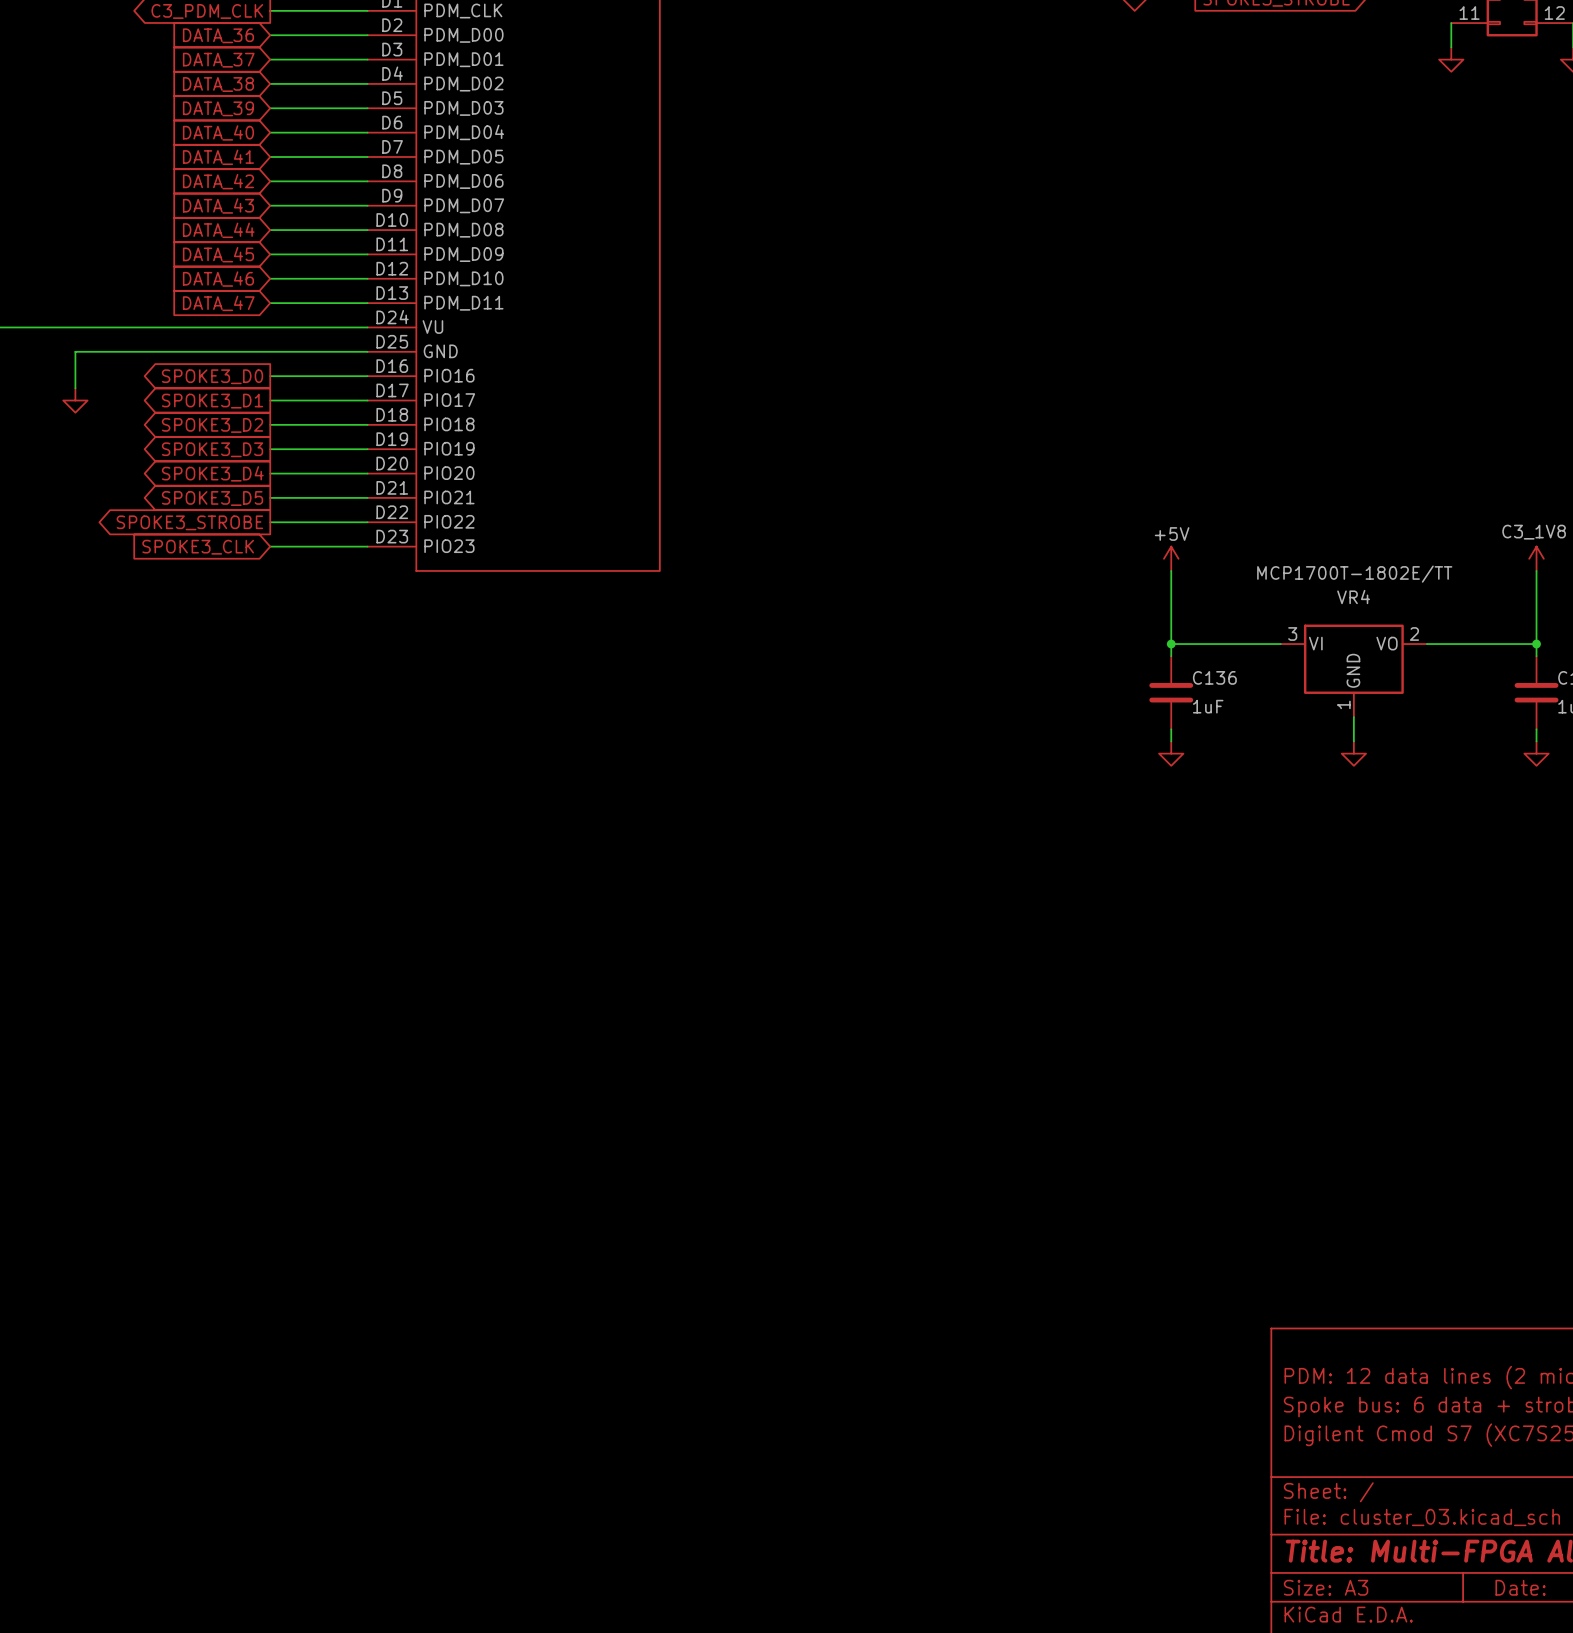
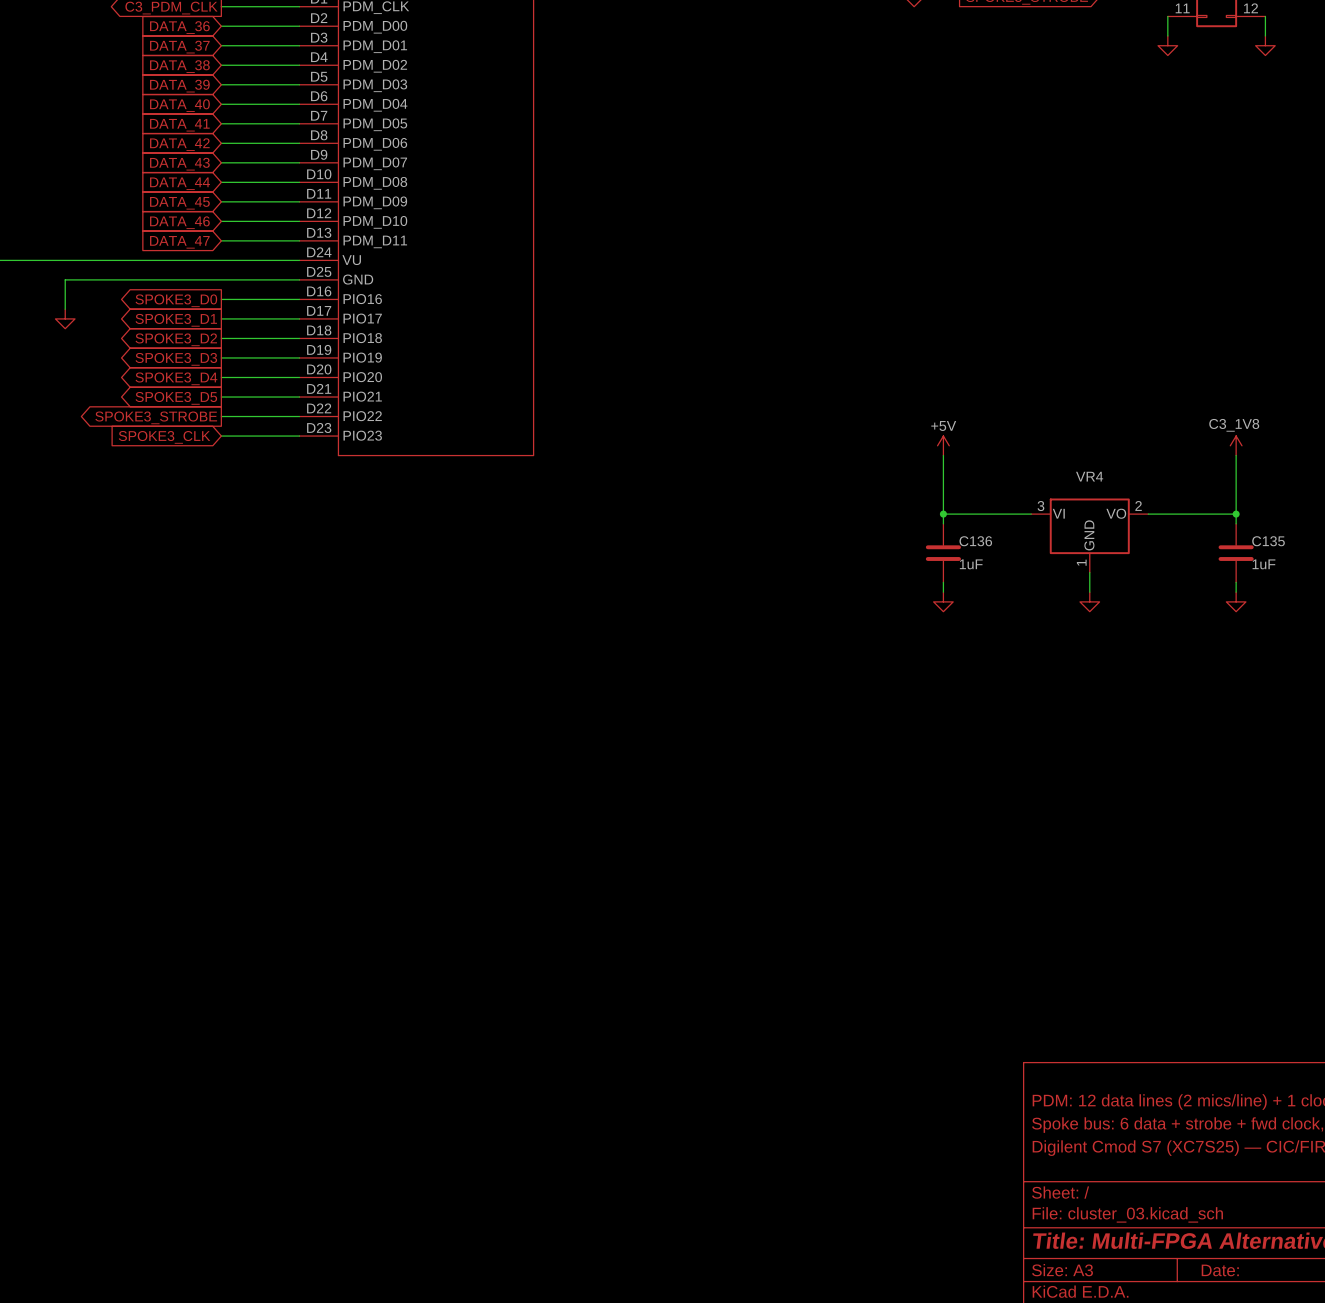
VR4 value: MCP1700T-1802E/TT (1354, 574) -> none

